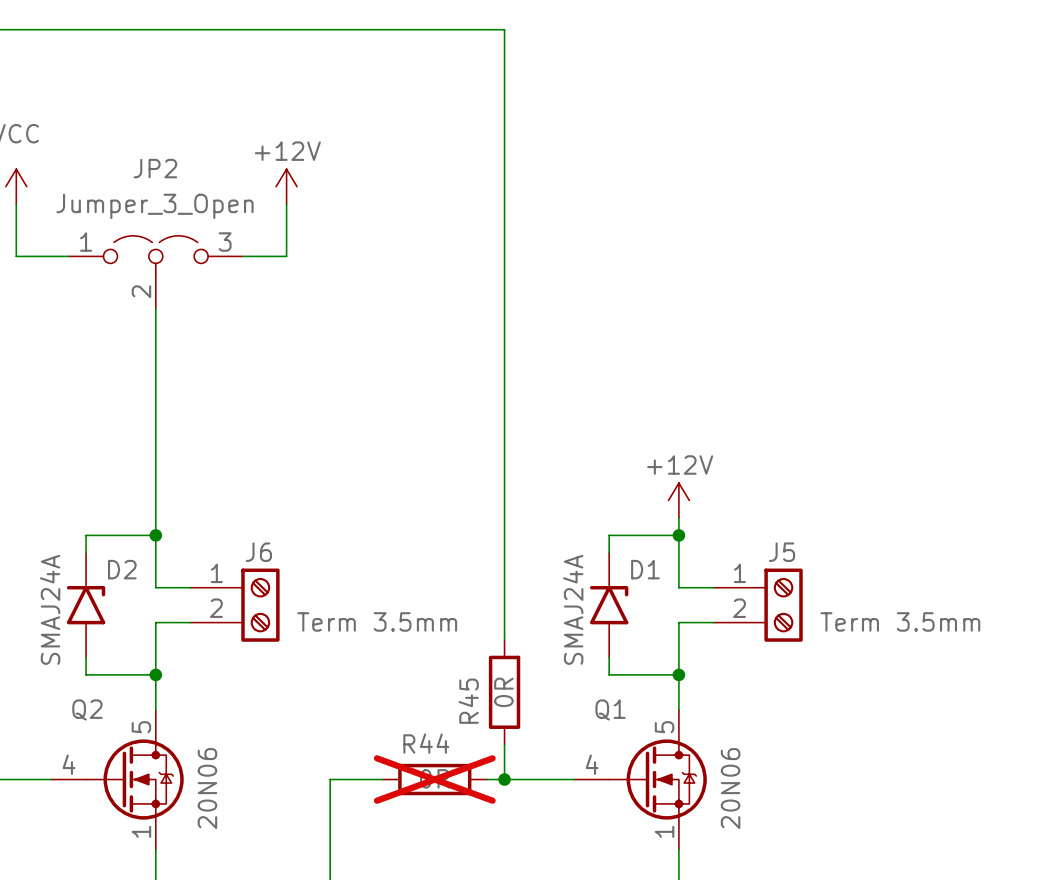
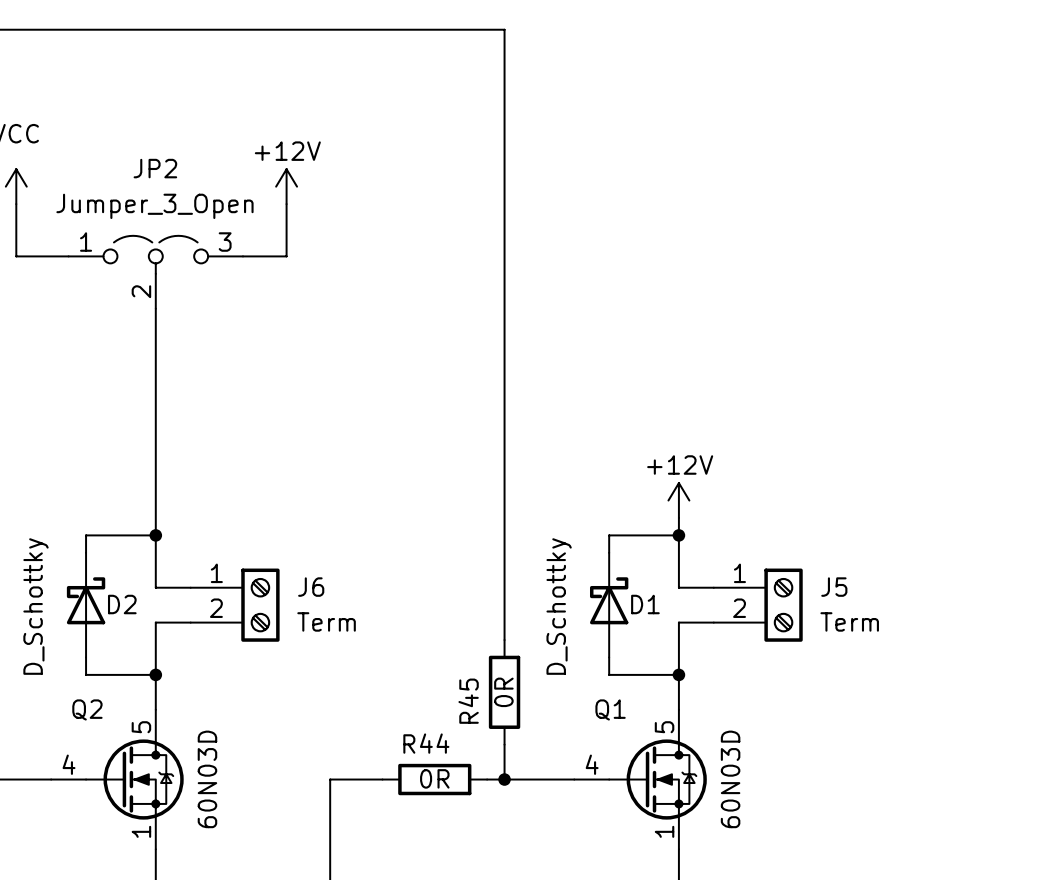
D2 symbol: [66, 552, 106, 658] -> [66, 552, 106, 658]
J6 name position: J6 (258, 552) -> J6 (311, 587)
D1 symbol: [589, 552, 629, 658] -> [589, 552, 629, 658]
J5 name position: J5 (782, 552) -> J5 (834, 587)
D2 name position: D2 (122, 569) -> D2 (122, 604)
D1 name position: D1 (645, 569) -> D1 (645, 604)
D2 value: SMAJ24A (50, 609) -> D_Schottky (36, 606)
D1 value: SMAJ24A (573, 609) -> D_Schottky (559, 606)
J6 value: Term 3.5mm (377, 621) -> Term (326, 621)
J5 value: Term 3.5mm (900, 621) -> Term (849, 621)
R44 do-not-place cross: (434, 779) -> none
Q2 value: 20N06 (207, 788) -> 60N03D (207, 779)
Q1 value: 20N06 (730, 788) -> 60N03D (730, 779)

